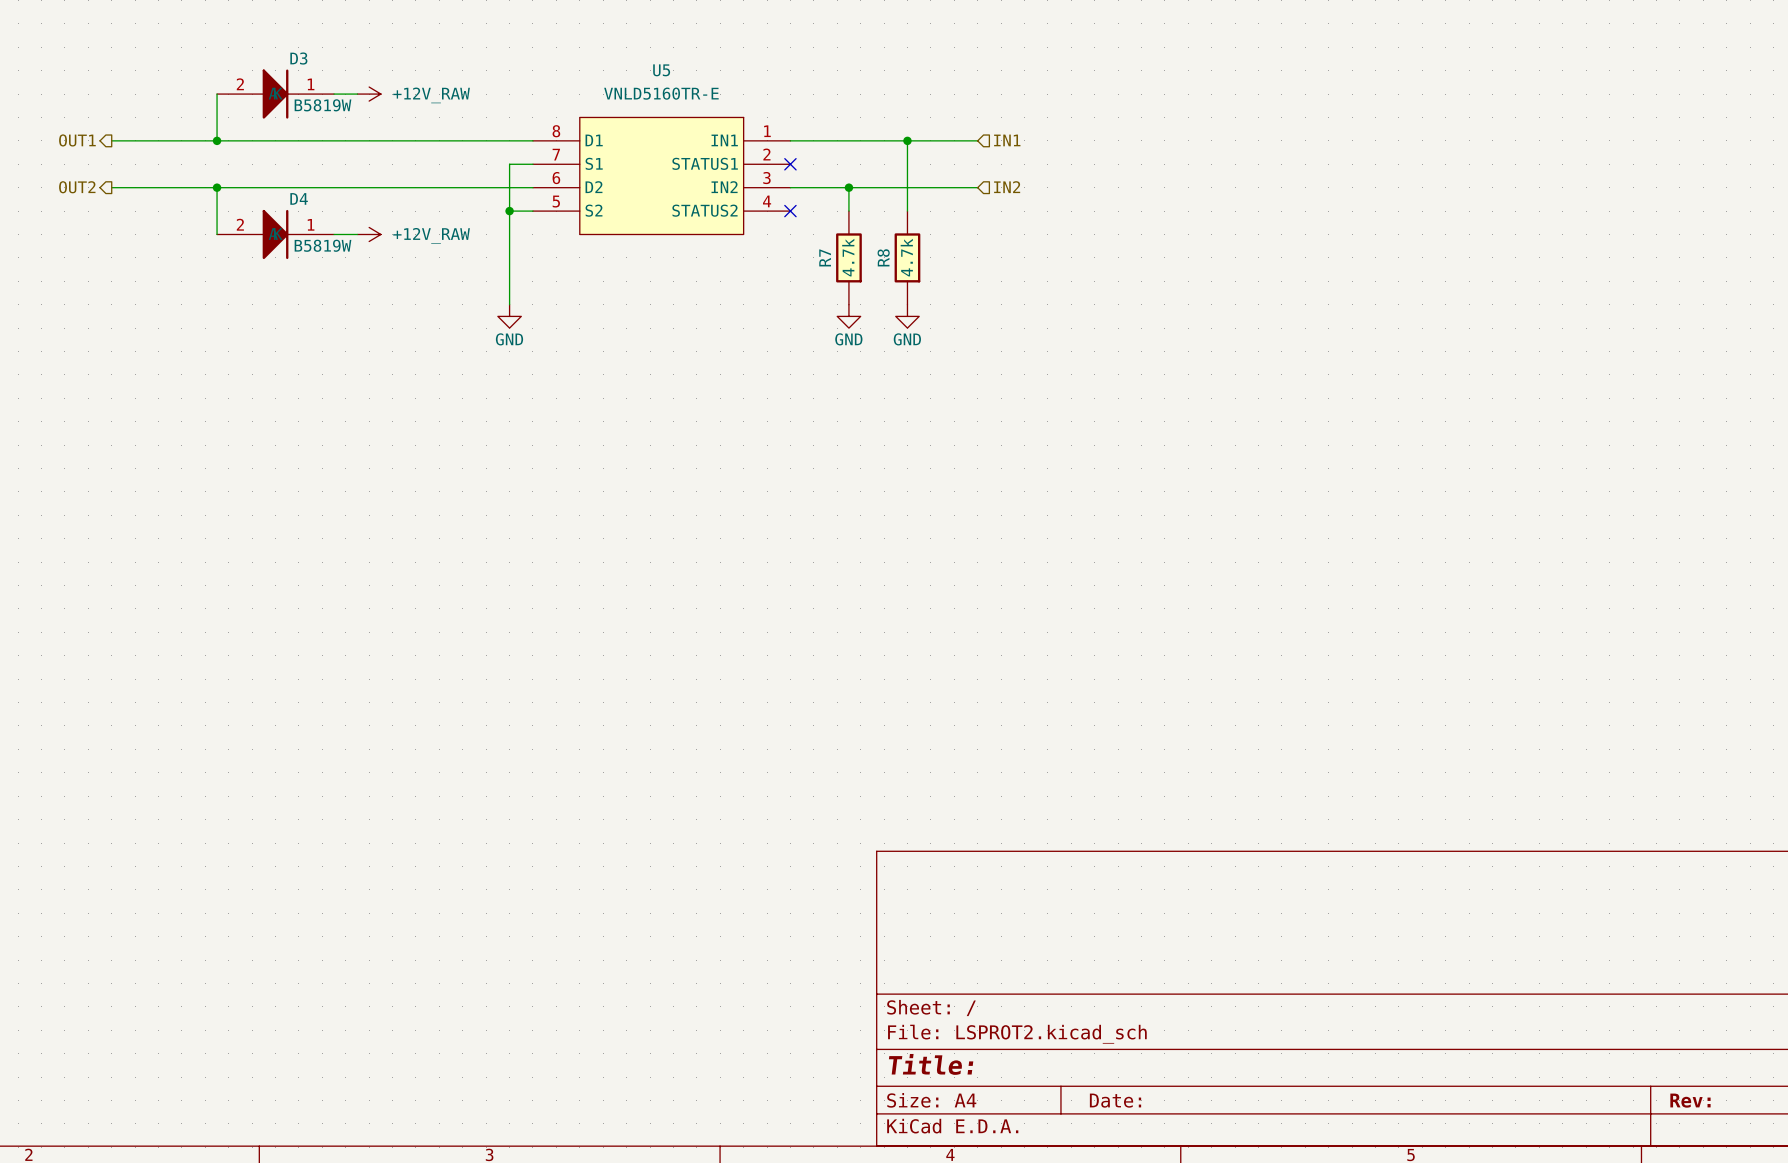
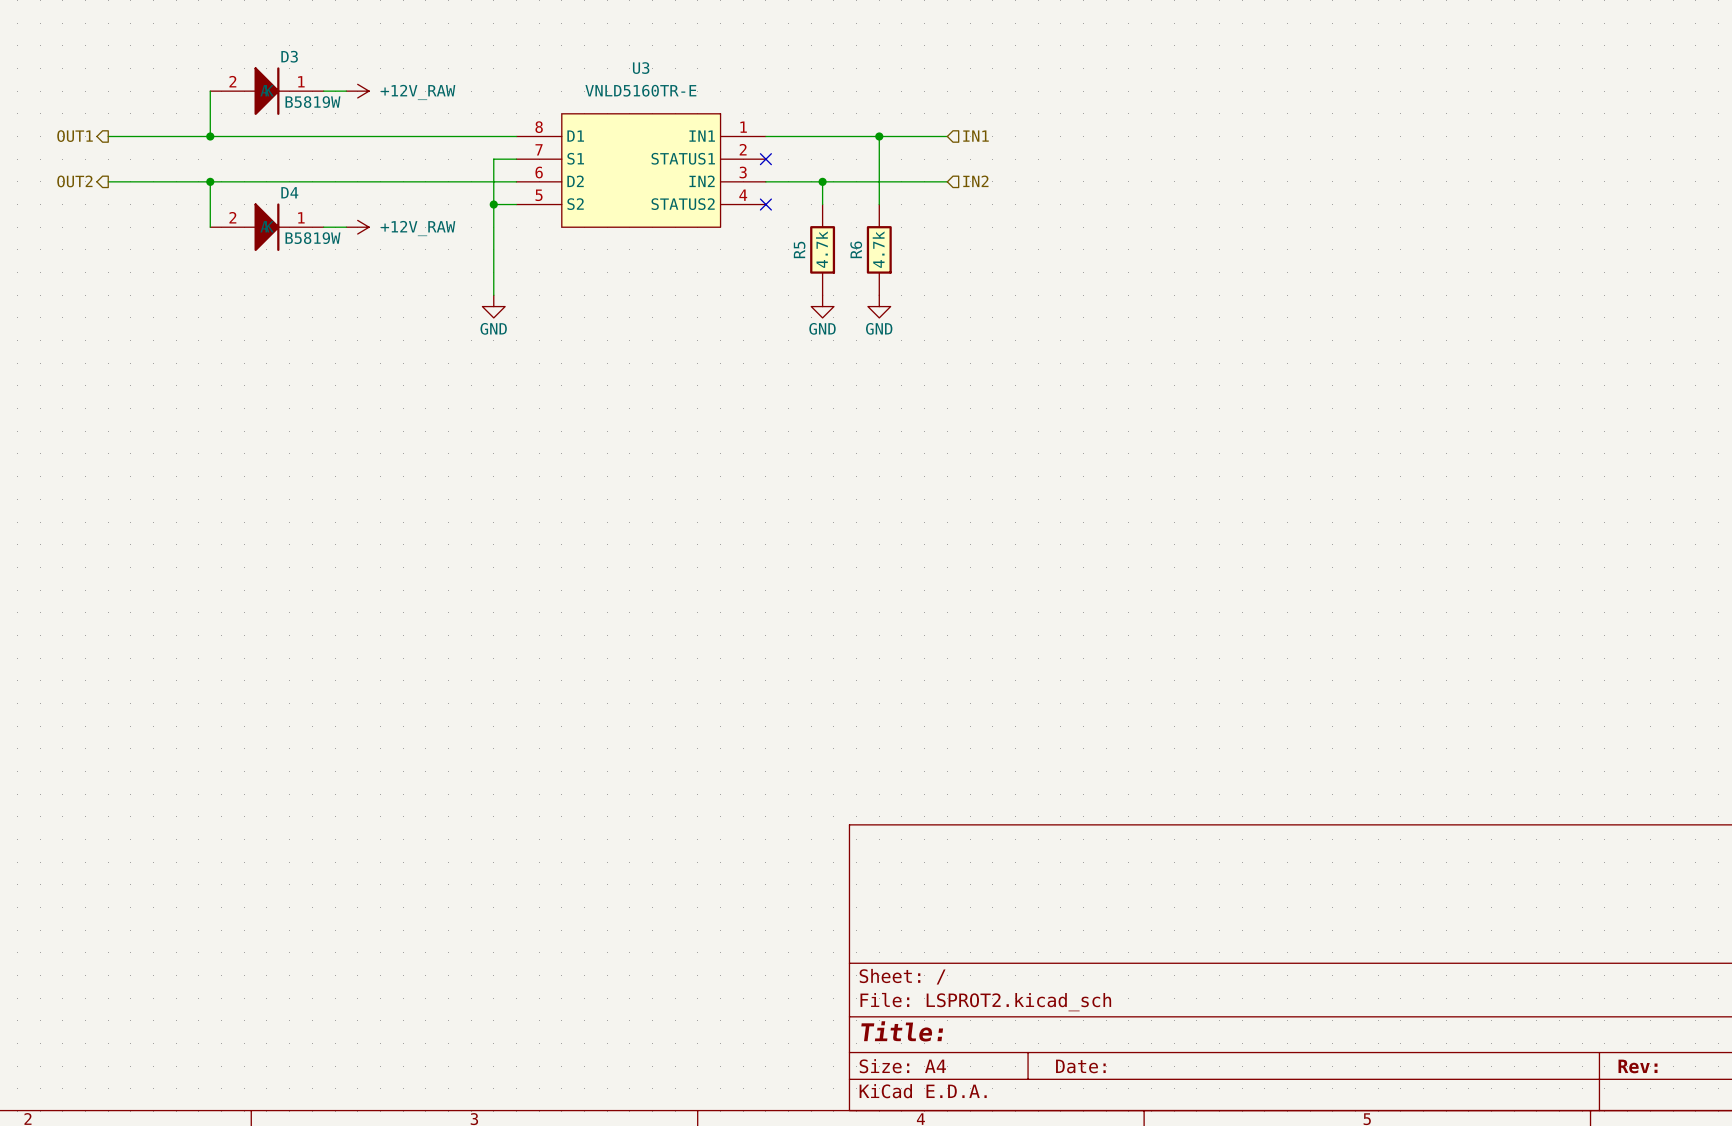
U5 name: U5 (661, 70) -> U3 (641, 68)
R7 name: R7 (825, 257) -> R5 (799, 249)
R8 name: R8 (883, 257) -> R6 (856, 249)

